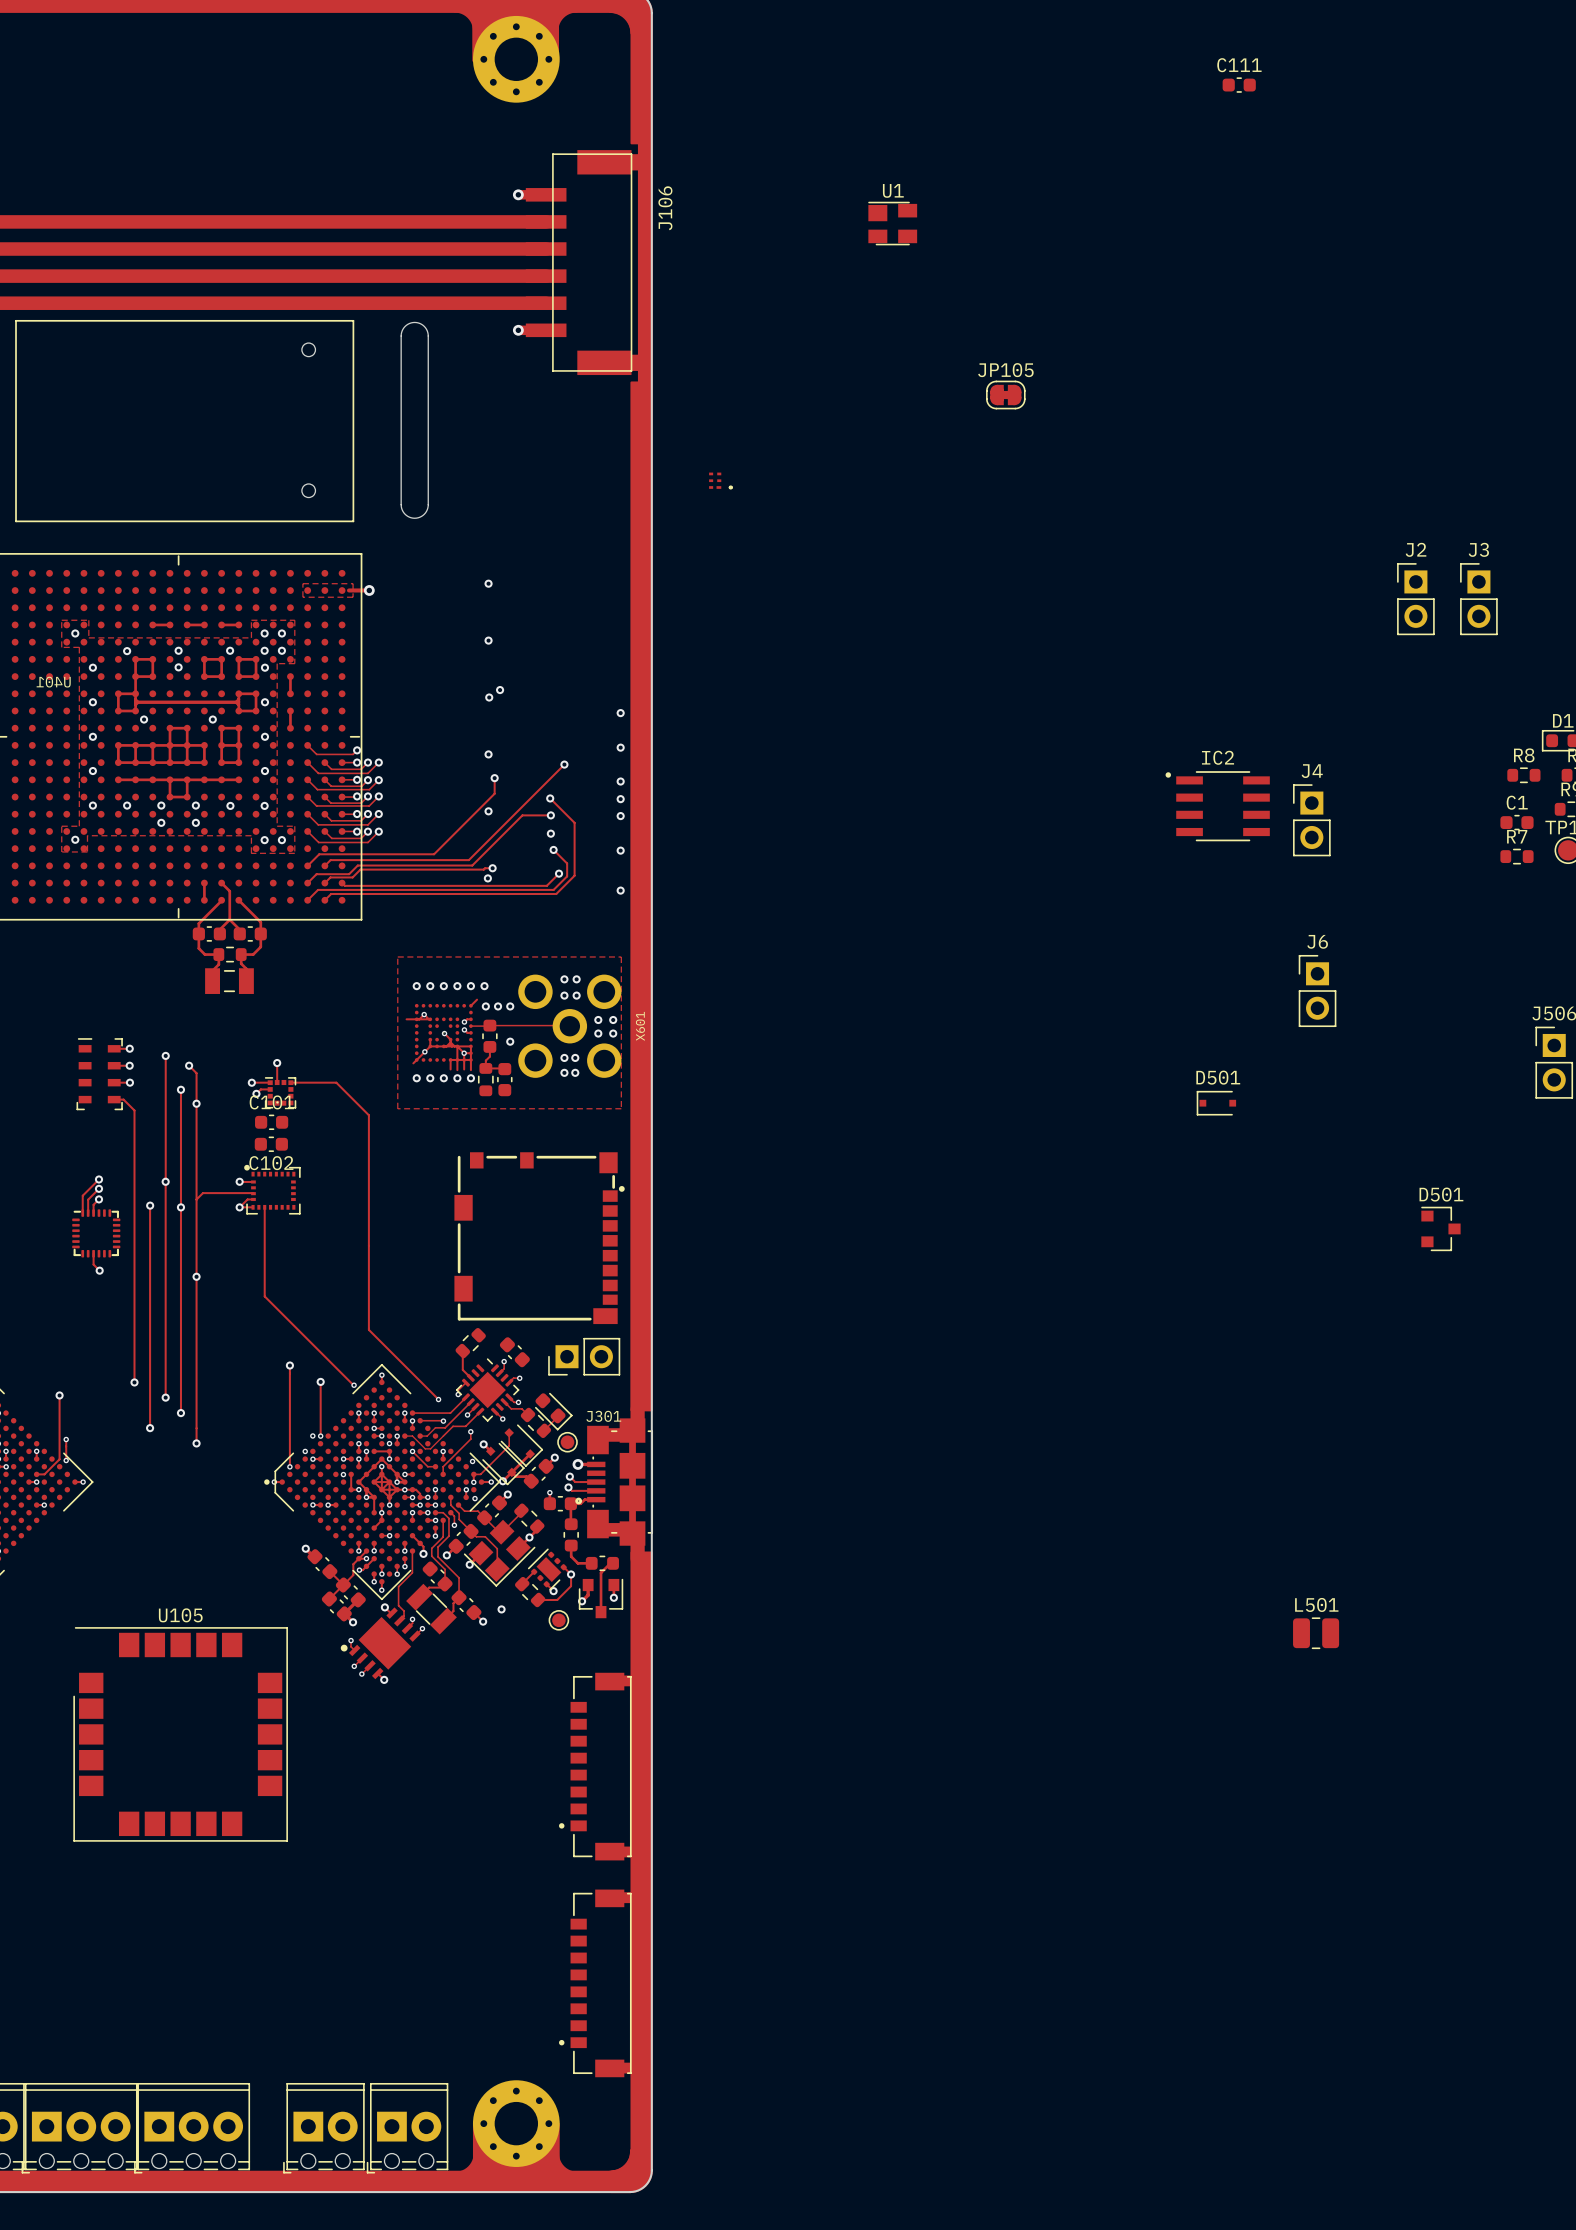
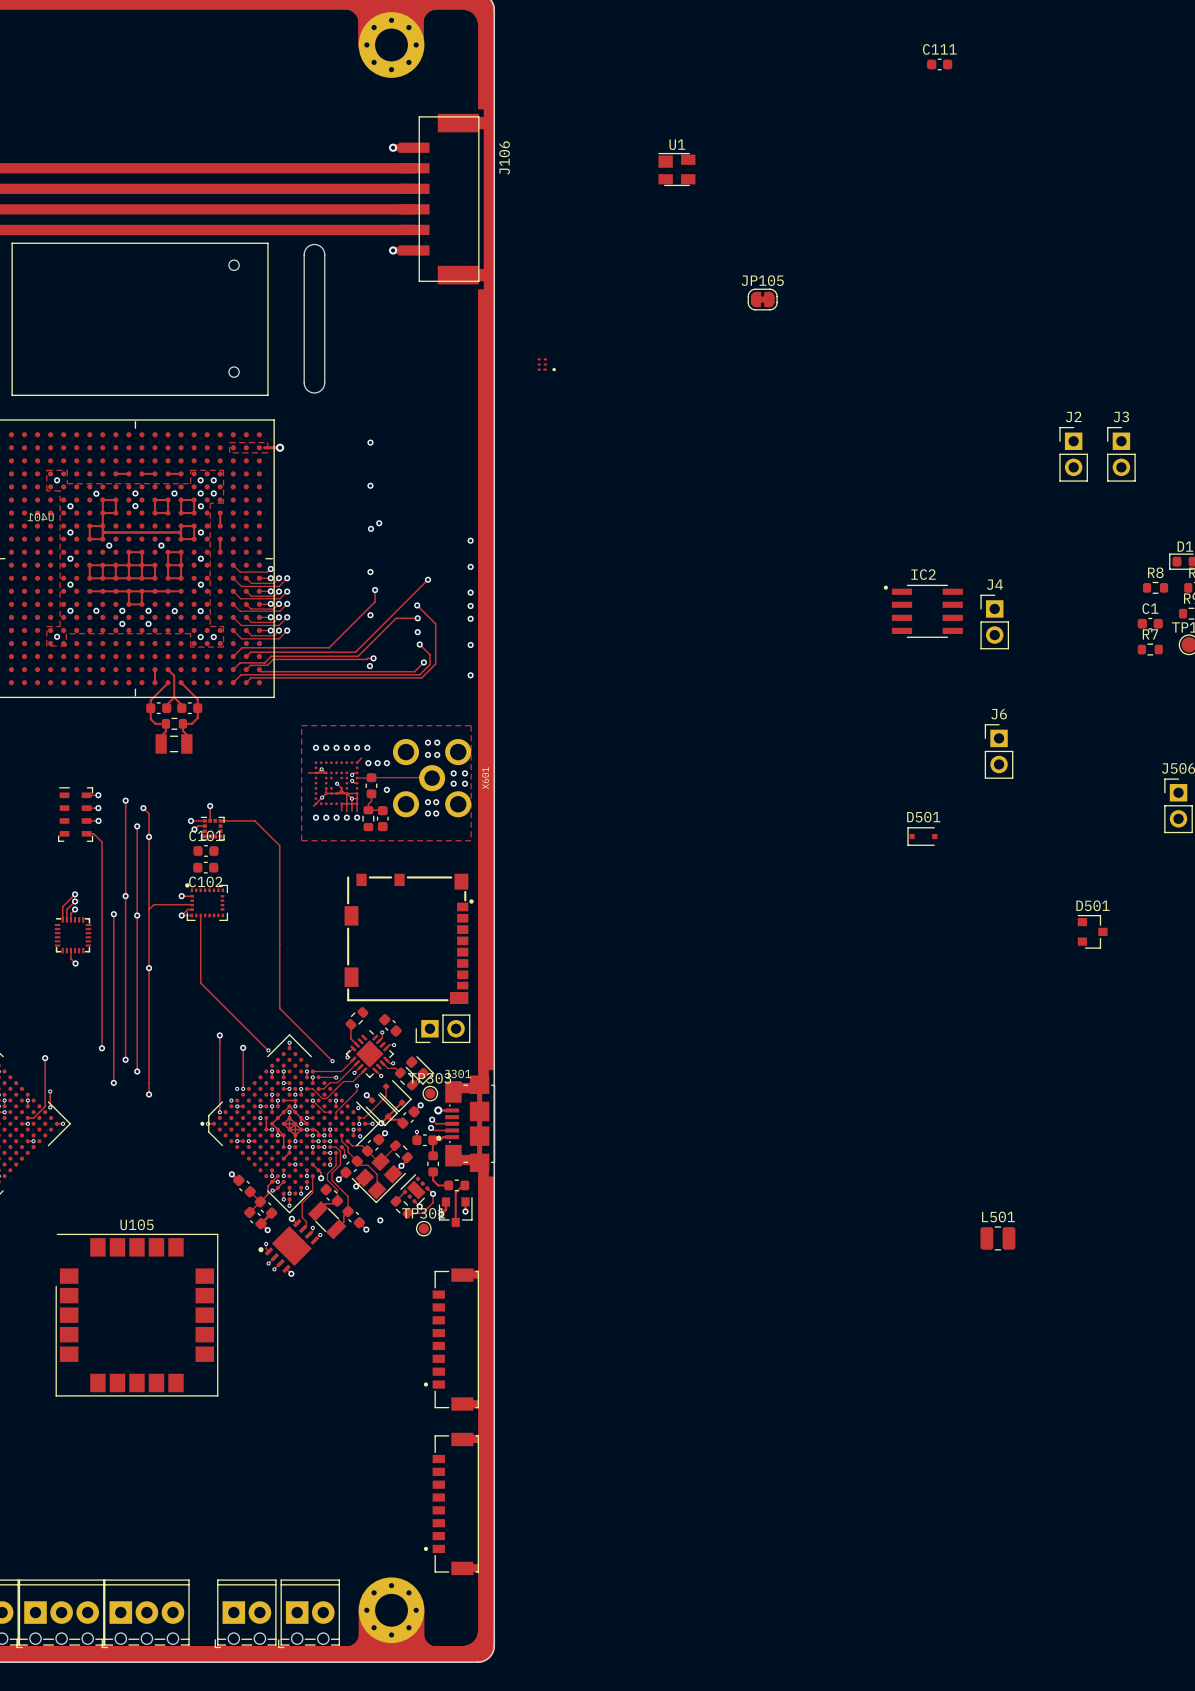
TP303 name: none -> TP303 (429, 1078)
TP301 name: none -> TP301 (423, 1213)

